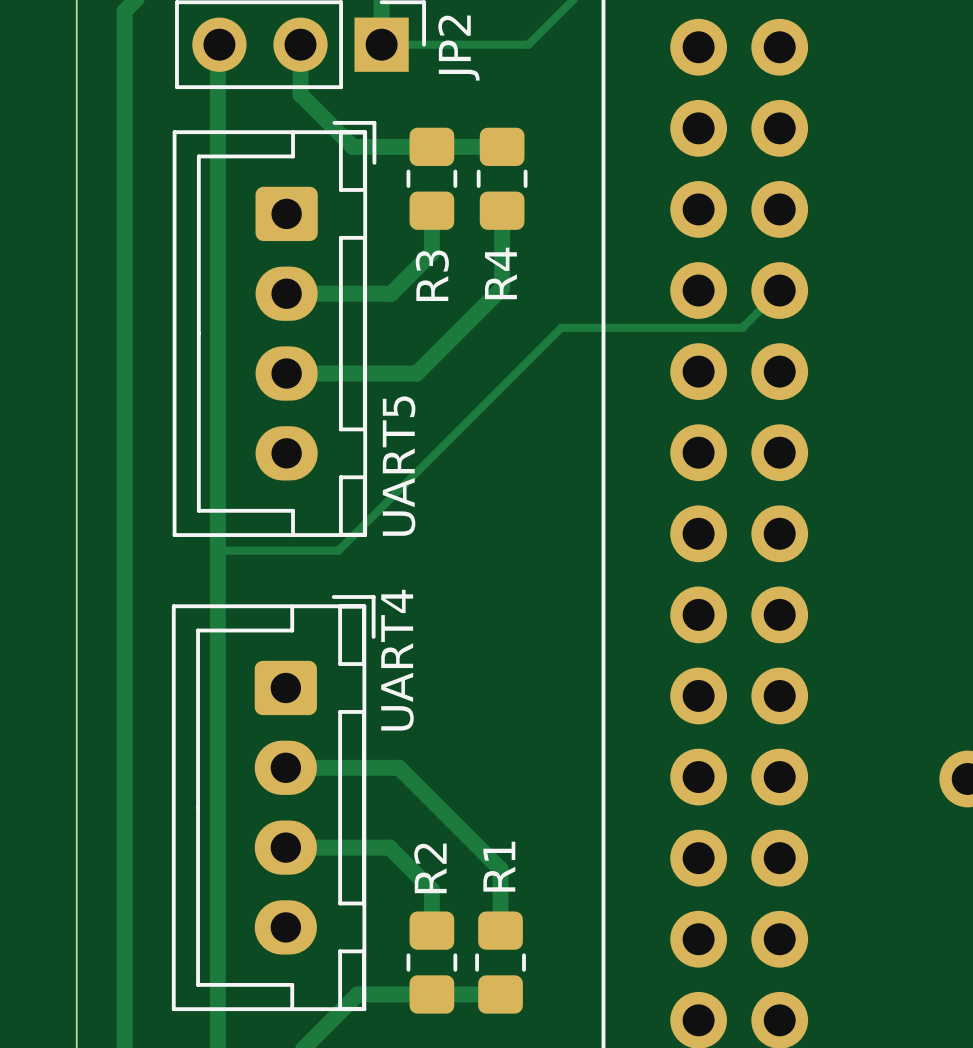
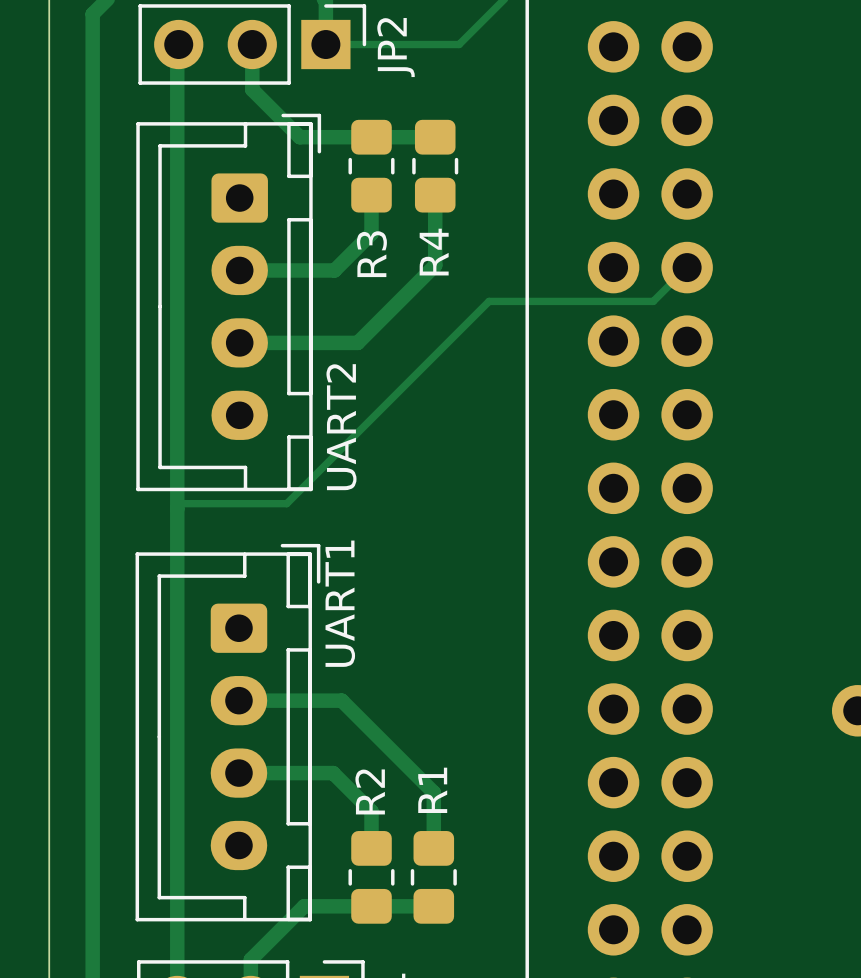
UART5 name: UART5 (399, 466) -> UART2 (341, 427)
UART4 name: UART4 (397, 660) -> UART1 (340, 603)

